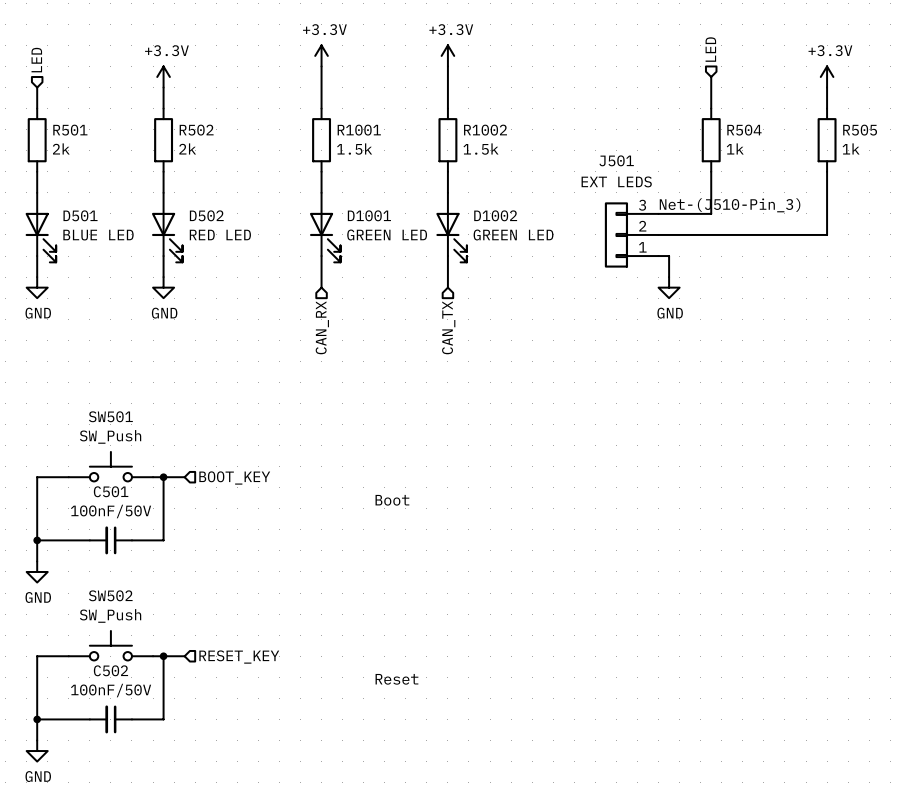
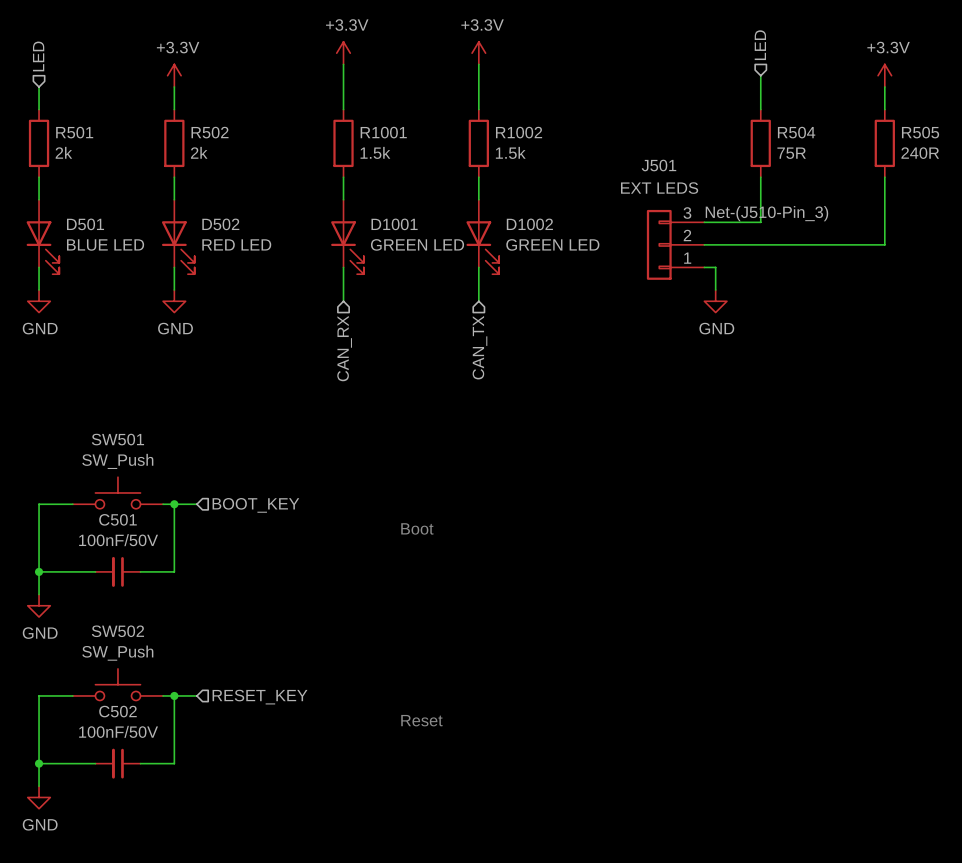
R504 value: 1k (735, 148) -> 75R (791, 153)
R505 value: 1k (851, 148) -> 240R (920, 153)

